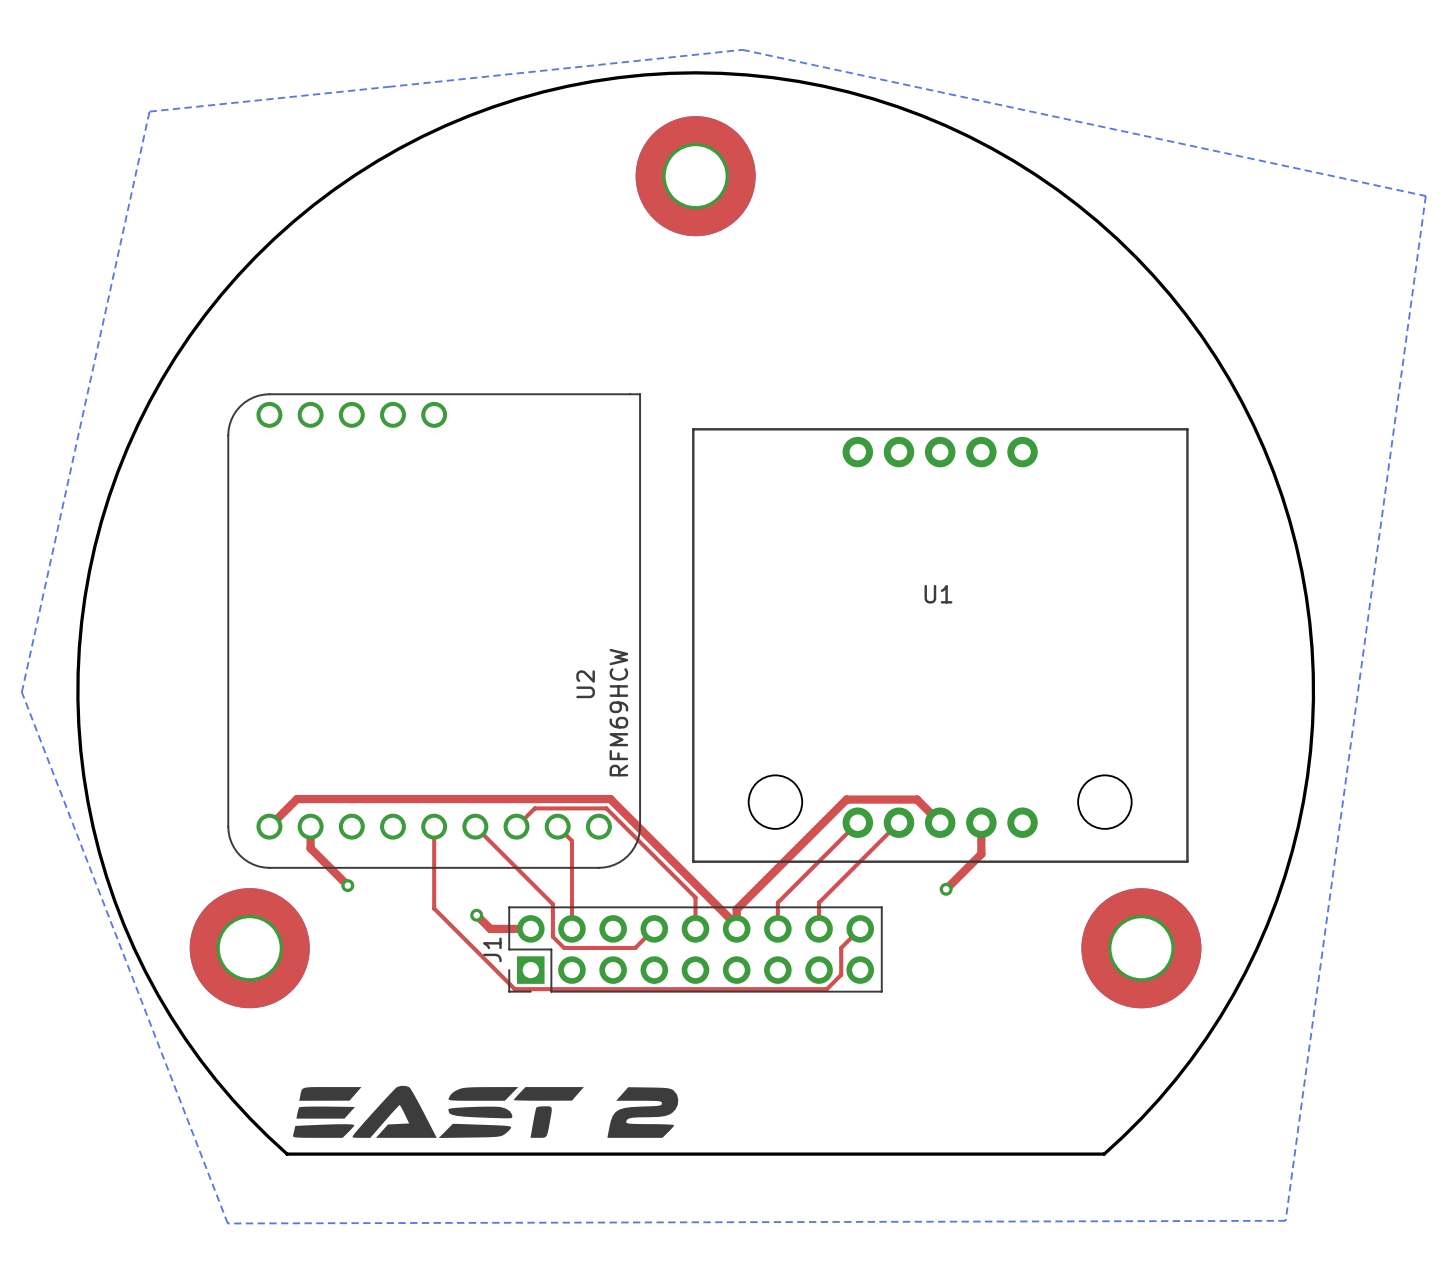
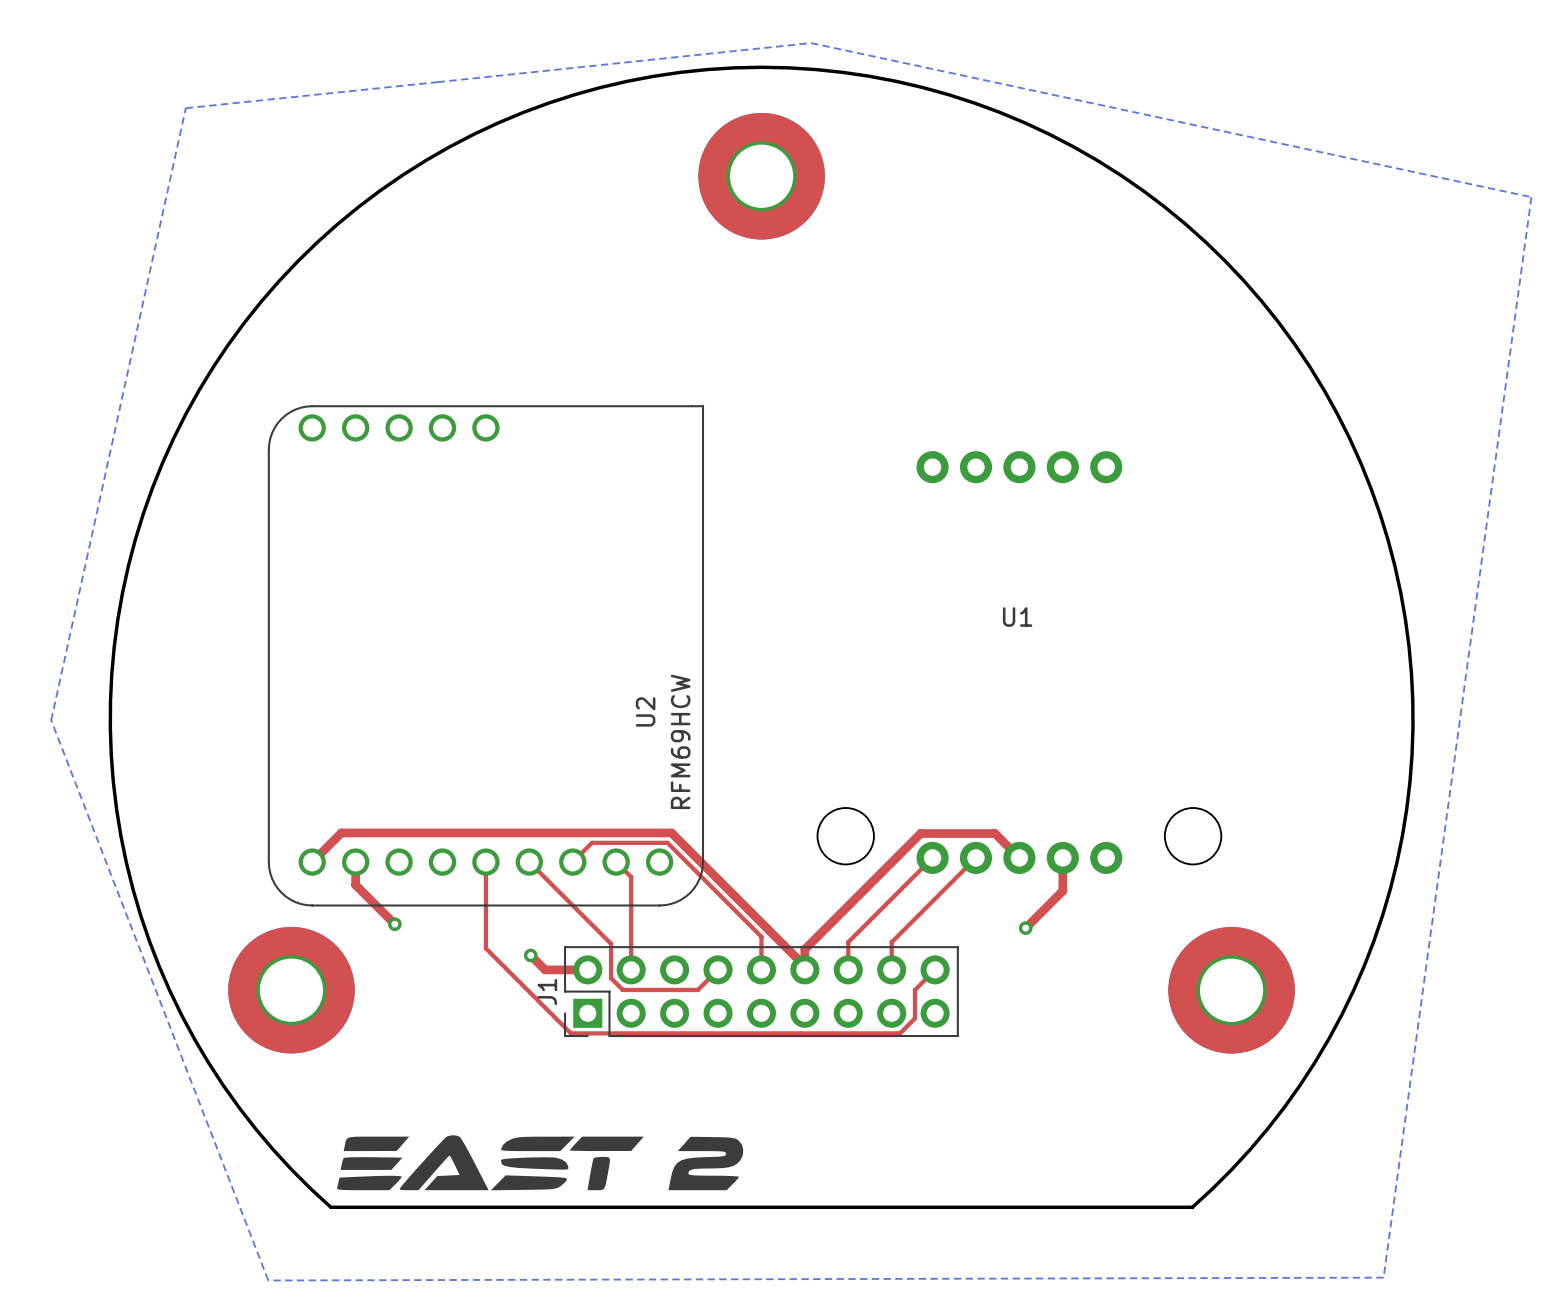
line: (693, 429) (1187, 429) (1187, 861) (693, 861) (693, 429) -> none

